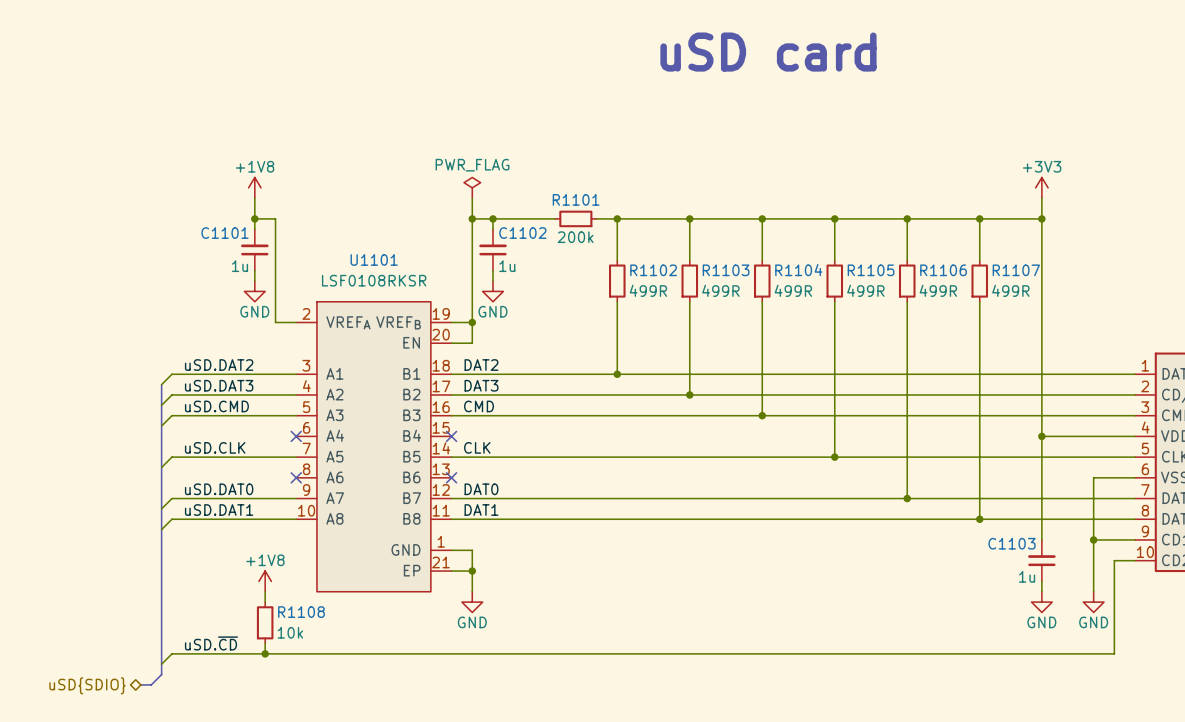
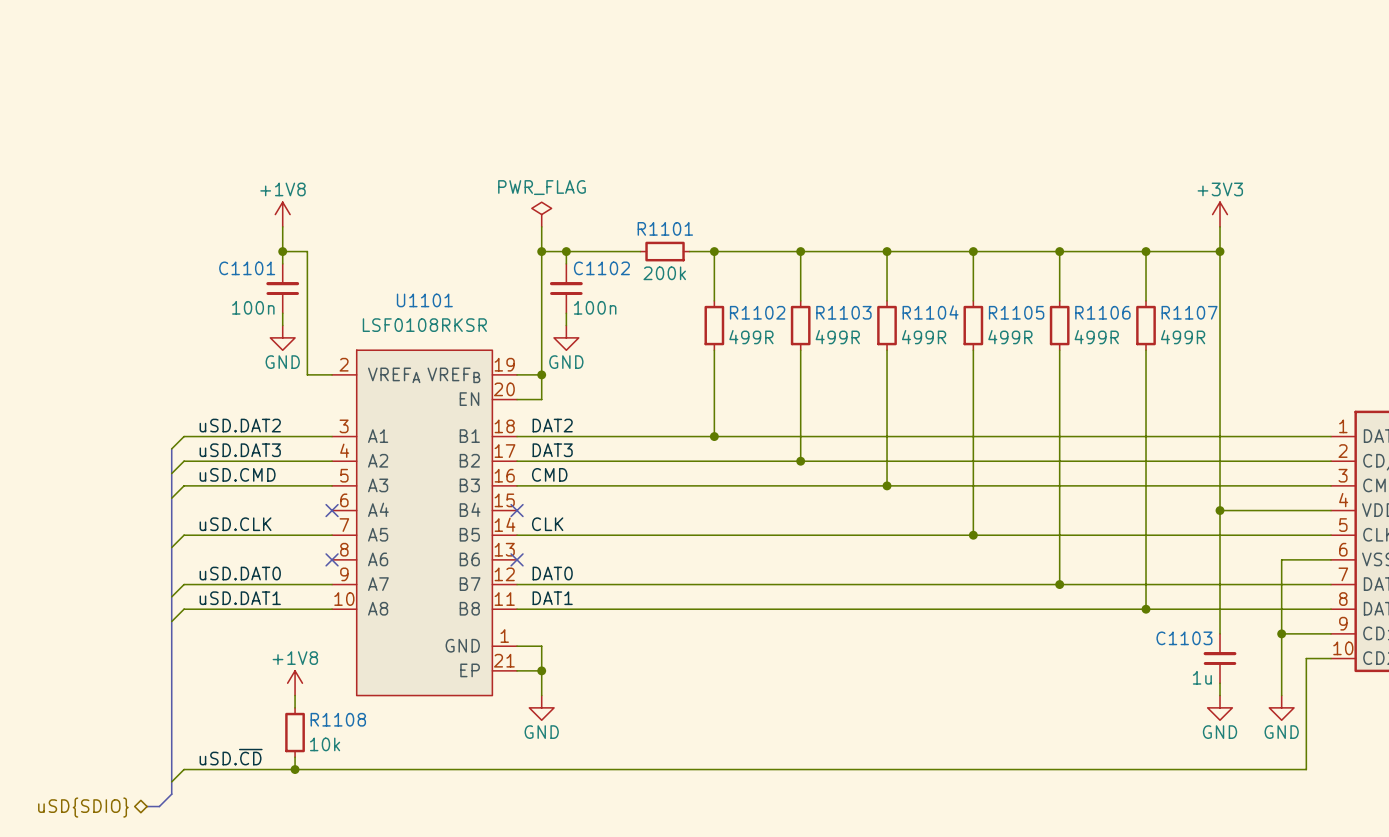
text: uSD card (768, 52) -> none
C1101 text: 1u (240, 266) -> 100n (253, 307)
C1102 text: 1u (507, 266) -> 100n (595, 307)

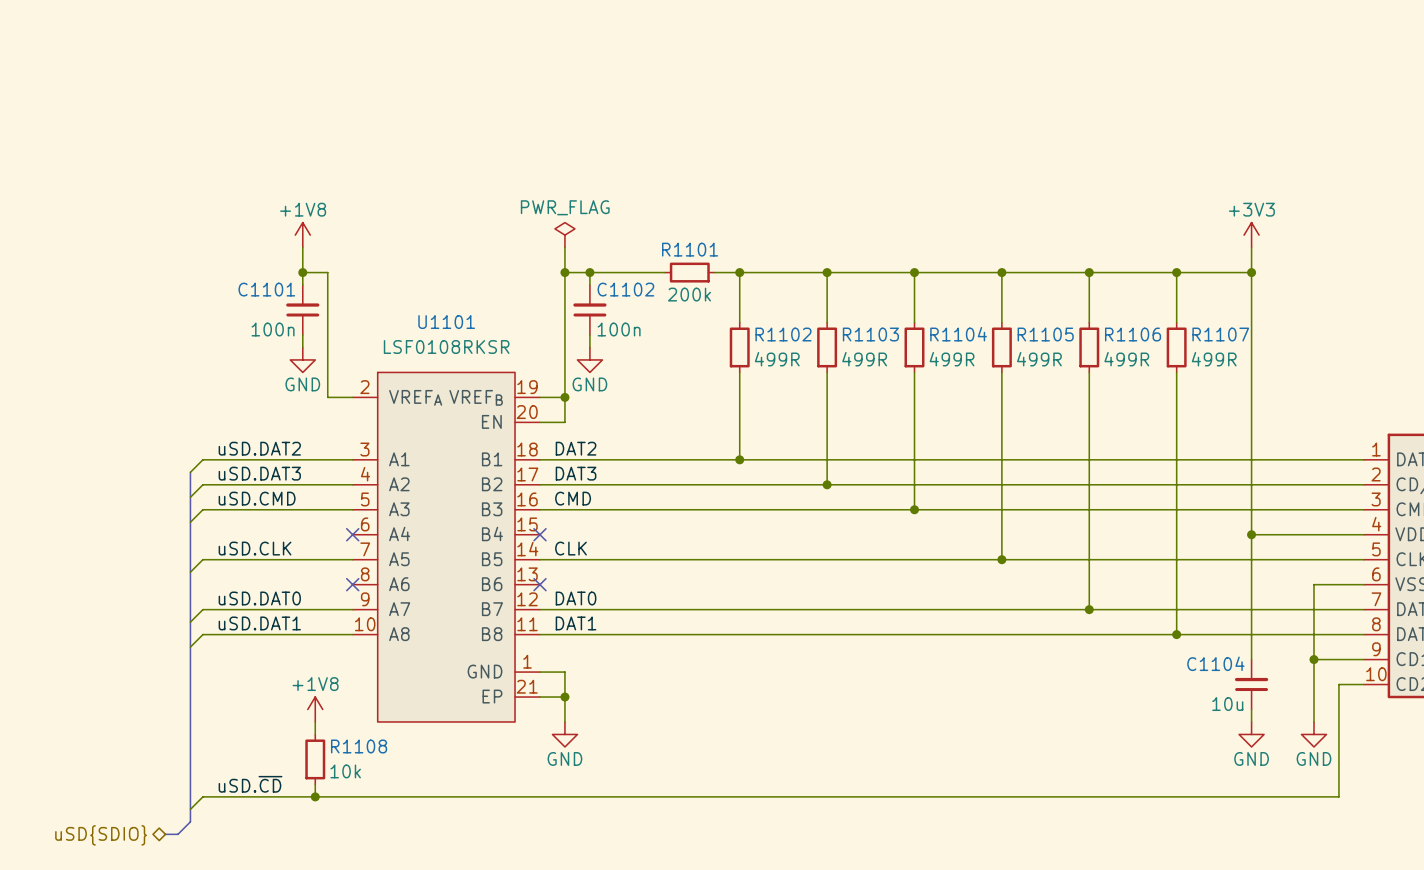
C1103 name: C1103 (1184, 638) -> C1104 (1215, 663)
C1103 text: 1u (1202, 677) -> 10u (1227, 704)

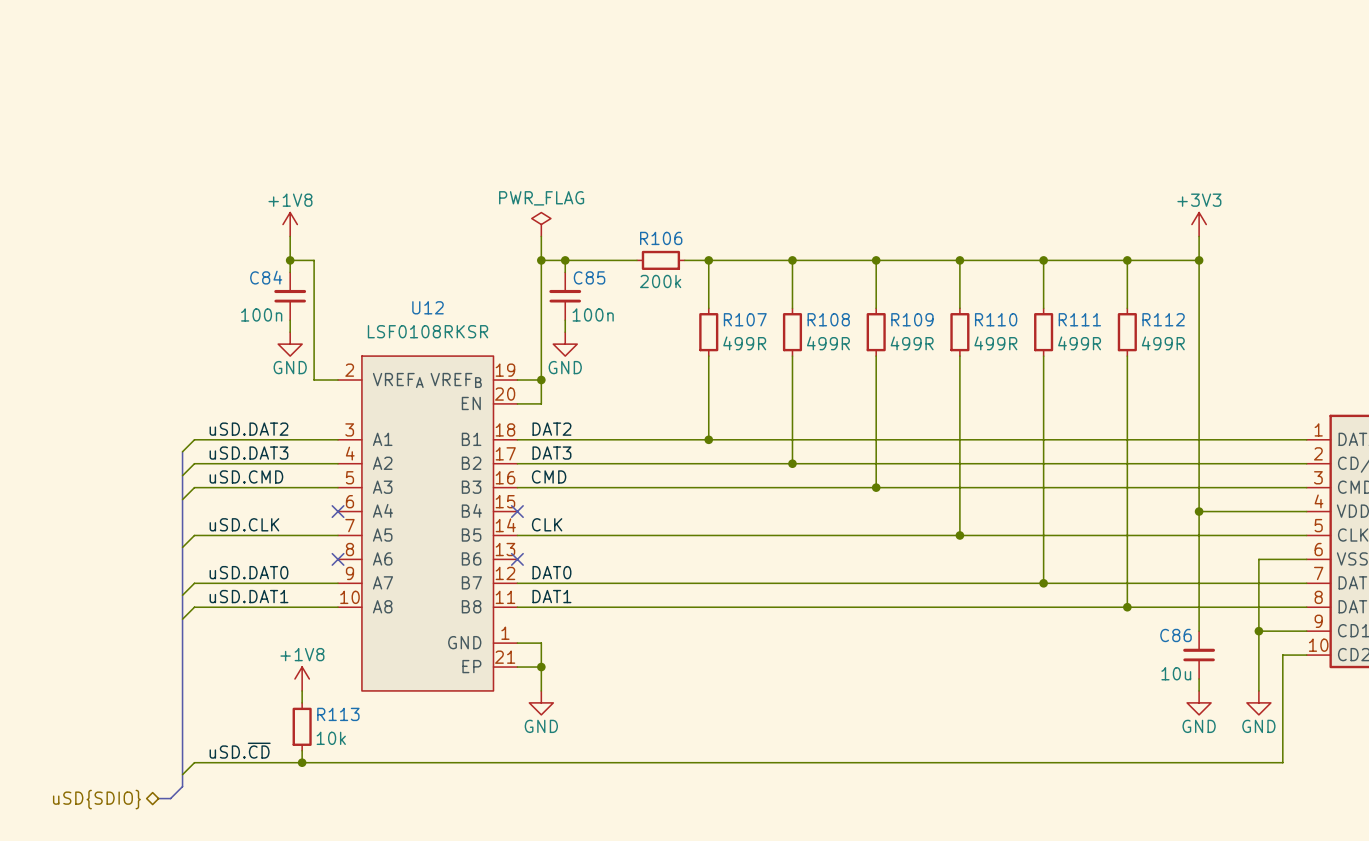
R1101 name: R1101 (690, 249) -> R106 (661, 238)
C1101 name: C1101 (266, 289) -> C84 (266, 277)
C1102 name: C1102 (625, 289) -> C85 (589, 277)
U1101 name: U1101 (446, 322) -> U12 (428, 307)
R1102 name: R1102 (783, 334) -> R107 (745, 319)
R1103 name: R1103 (870, 334) -> R108 (828, 319)
R1104 name: R1104 (958, 334) -> R109 (912, 319)
R1105 name: R1105 (1045, 334) -> R110 (996, 319)
R1106 name: R1106 (1133, 334) -> R111 (1079, 319)
R1107 name: R1107 (1220, 334) -> R112 (1163, 319)
C1104 name: C1104 (1215, 663) -> C86 (1176, 635)
R1108 name: R1108 (359, 746) -> R113 (338, 714)

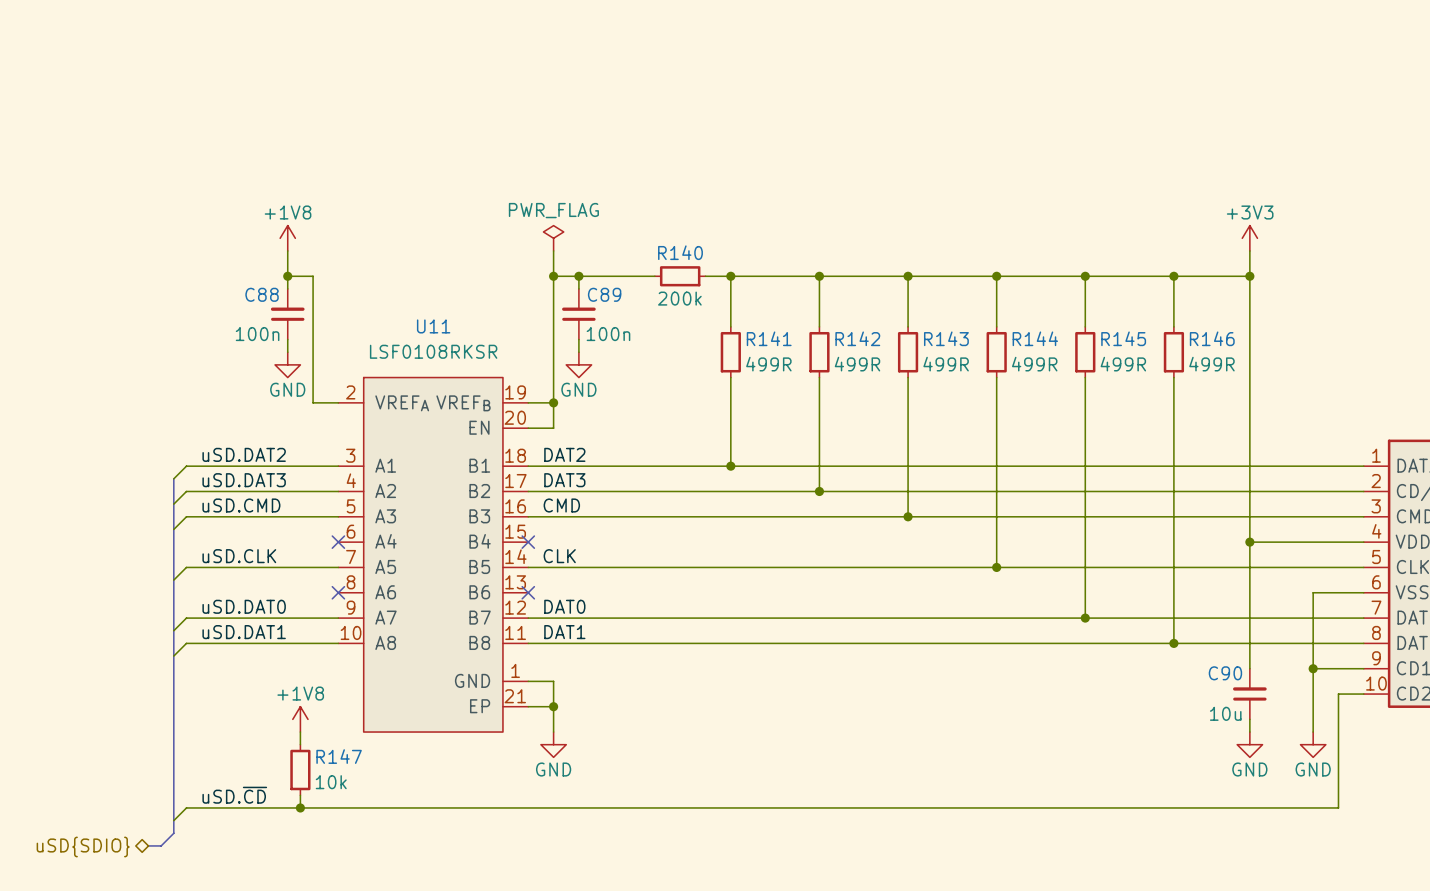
R106 name: R106 (661, 238) -> R140 (680, 252)
C84 name: C84 (266, 277) -> C88 (262, 294)
C85 name: C85 (589, 277) -> C89 (604, 294)
U12 name: U12 (428, 307) -> U11 (433, 326)
R107 name: R107 (745, 319) -> R141 (769, 338)
R108 name: R108 (828, 319) -> R142 (857, 338)
R109 name: R109 (912, 319) -> R143 (946, 338)
R110 name: R110 (996, 319) -> R144 (1035, 338)
R111 name: R111 (1079, 319) -> R145 (1123, 338)
R112 name: R112 (1163, 319) -> R146 (1212, 338)
C86 name: C86 (1176, 635) -> C90 (1225, 673)
R113 name: R113 (338, 714) -> R147 (339, 756)

